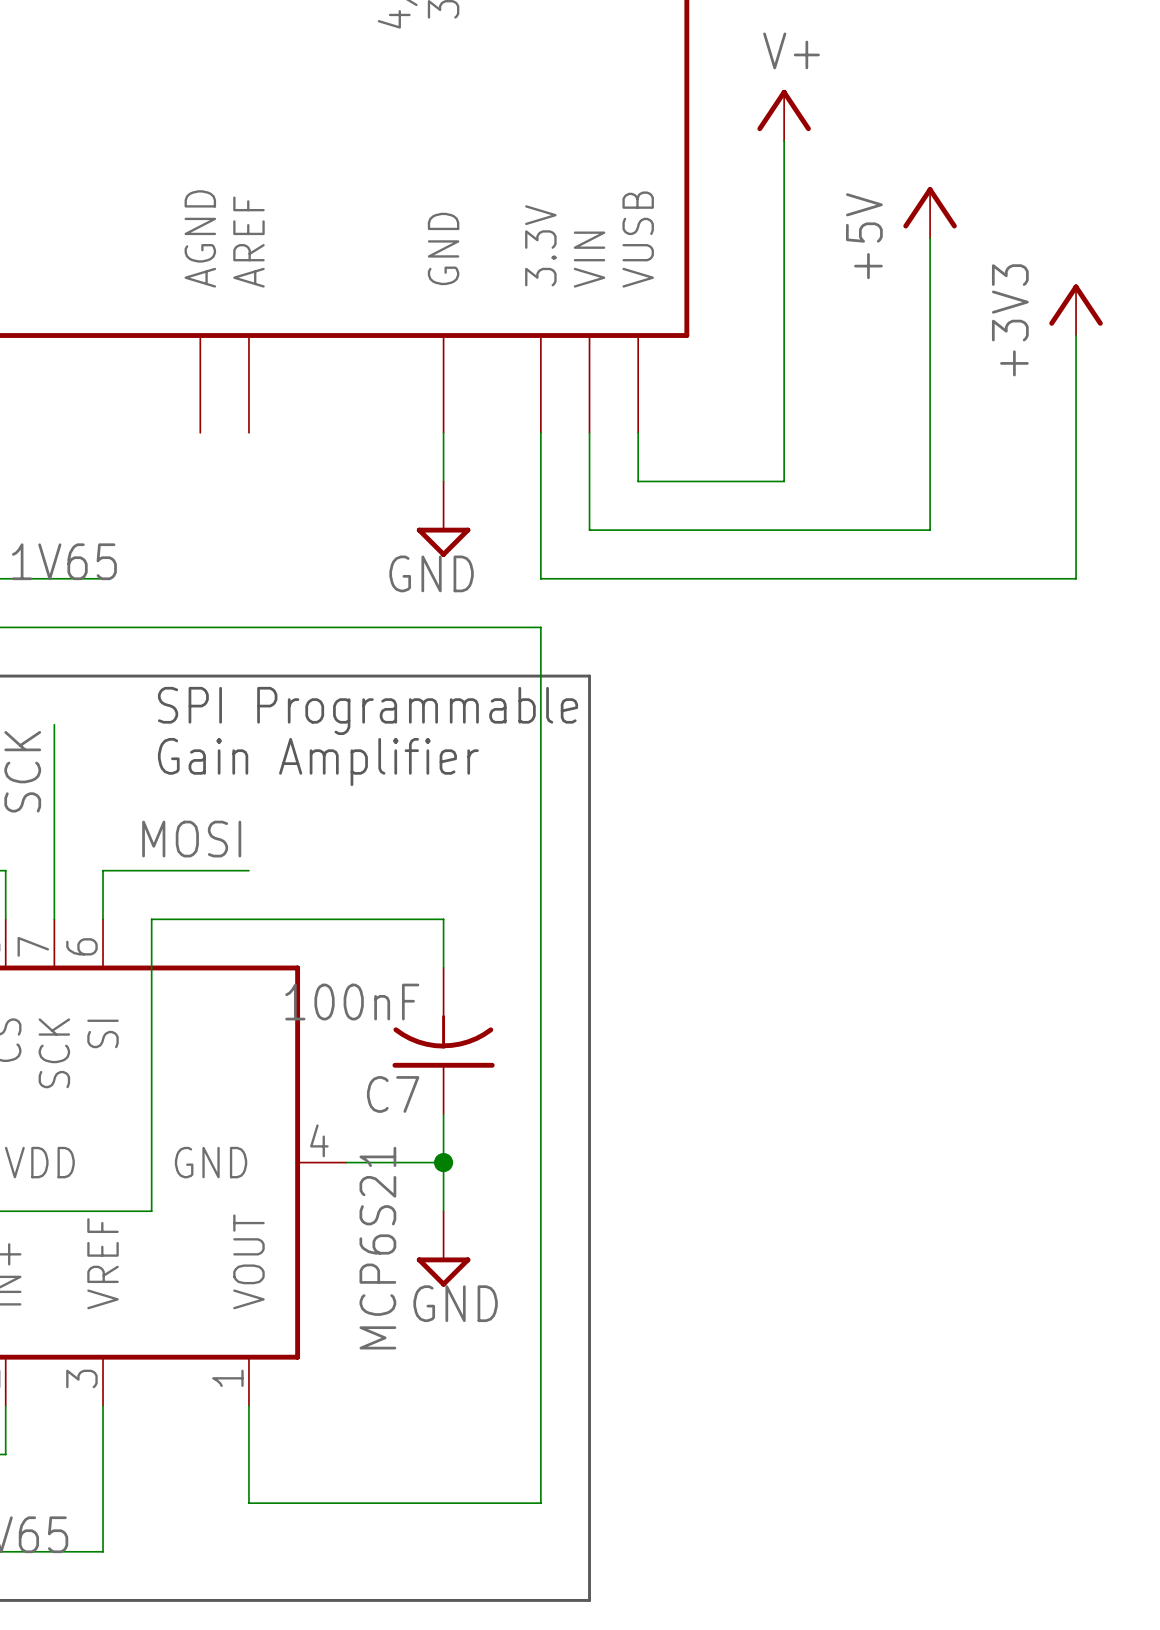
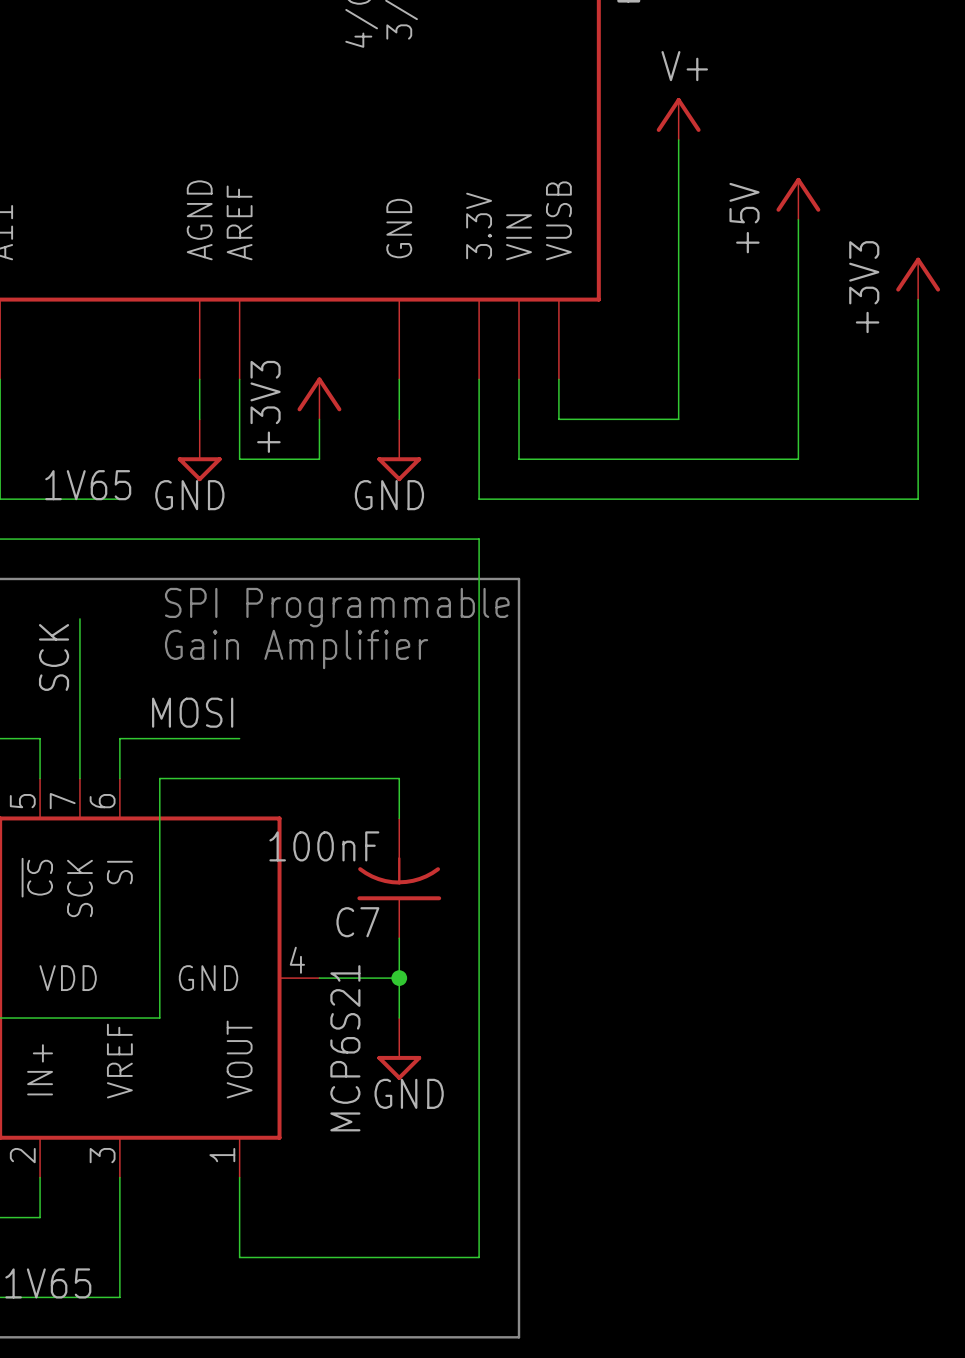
wire: none -> (199, 379) (199, 419)
wire: none -> (239, 379) (239, 459) (319, 459) (319, 419)
power symbol: none -> +3V3 (319, 398)
power symbol: none -> GND (199, 450)

